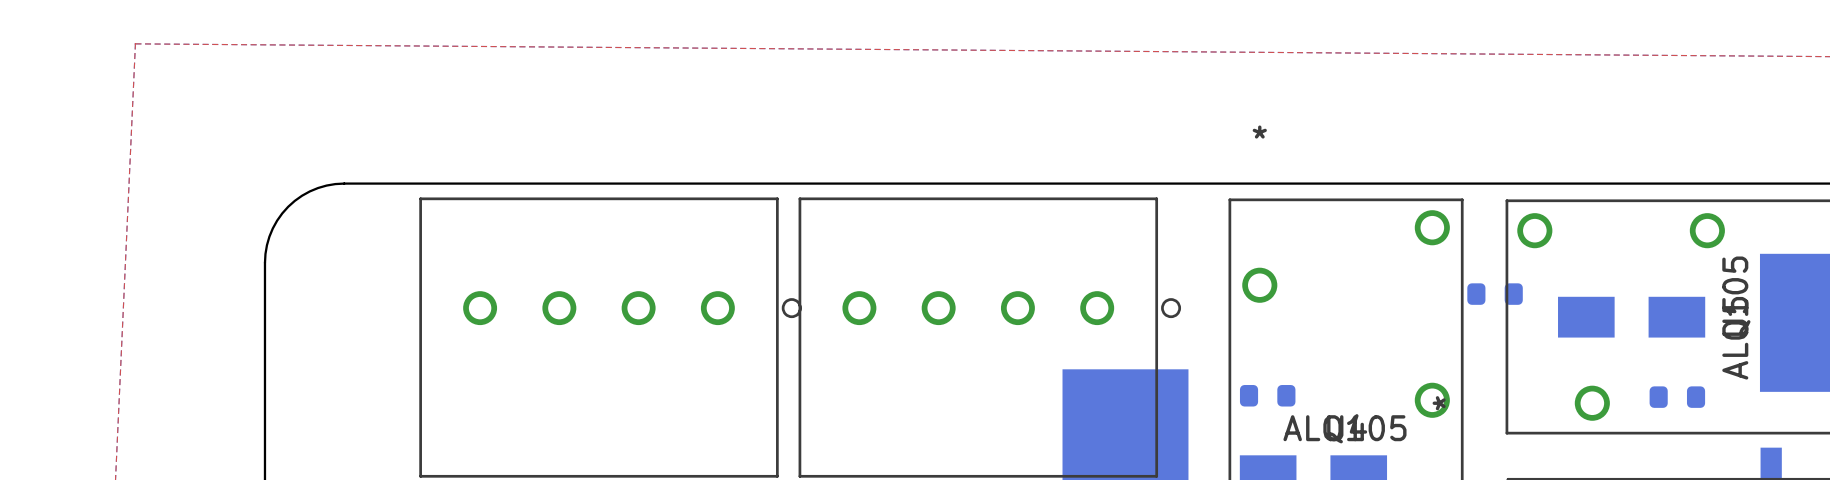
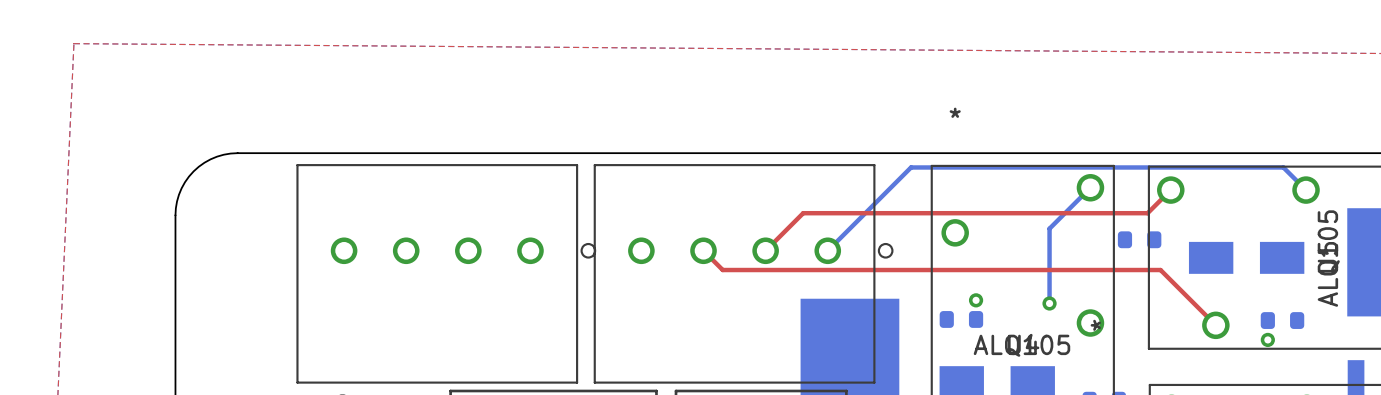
bottom track: none -> (1090, 187) (1049, 228) (1049, 303)
top track: none -> (1170, 190) (1147, 213) (803, 213) (765, 250)
bottom track: none -> (1306, 190) (1283, 167) (911, 167) (827, 250)
top track: none -> (703, 250) (722, 270) (1160, 270) (1215, 325)
via: none -> (976, 300)
via: none -> (1049, 303)
via: none -> (1267, 339)

